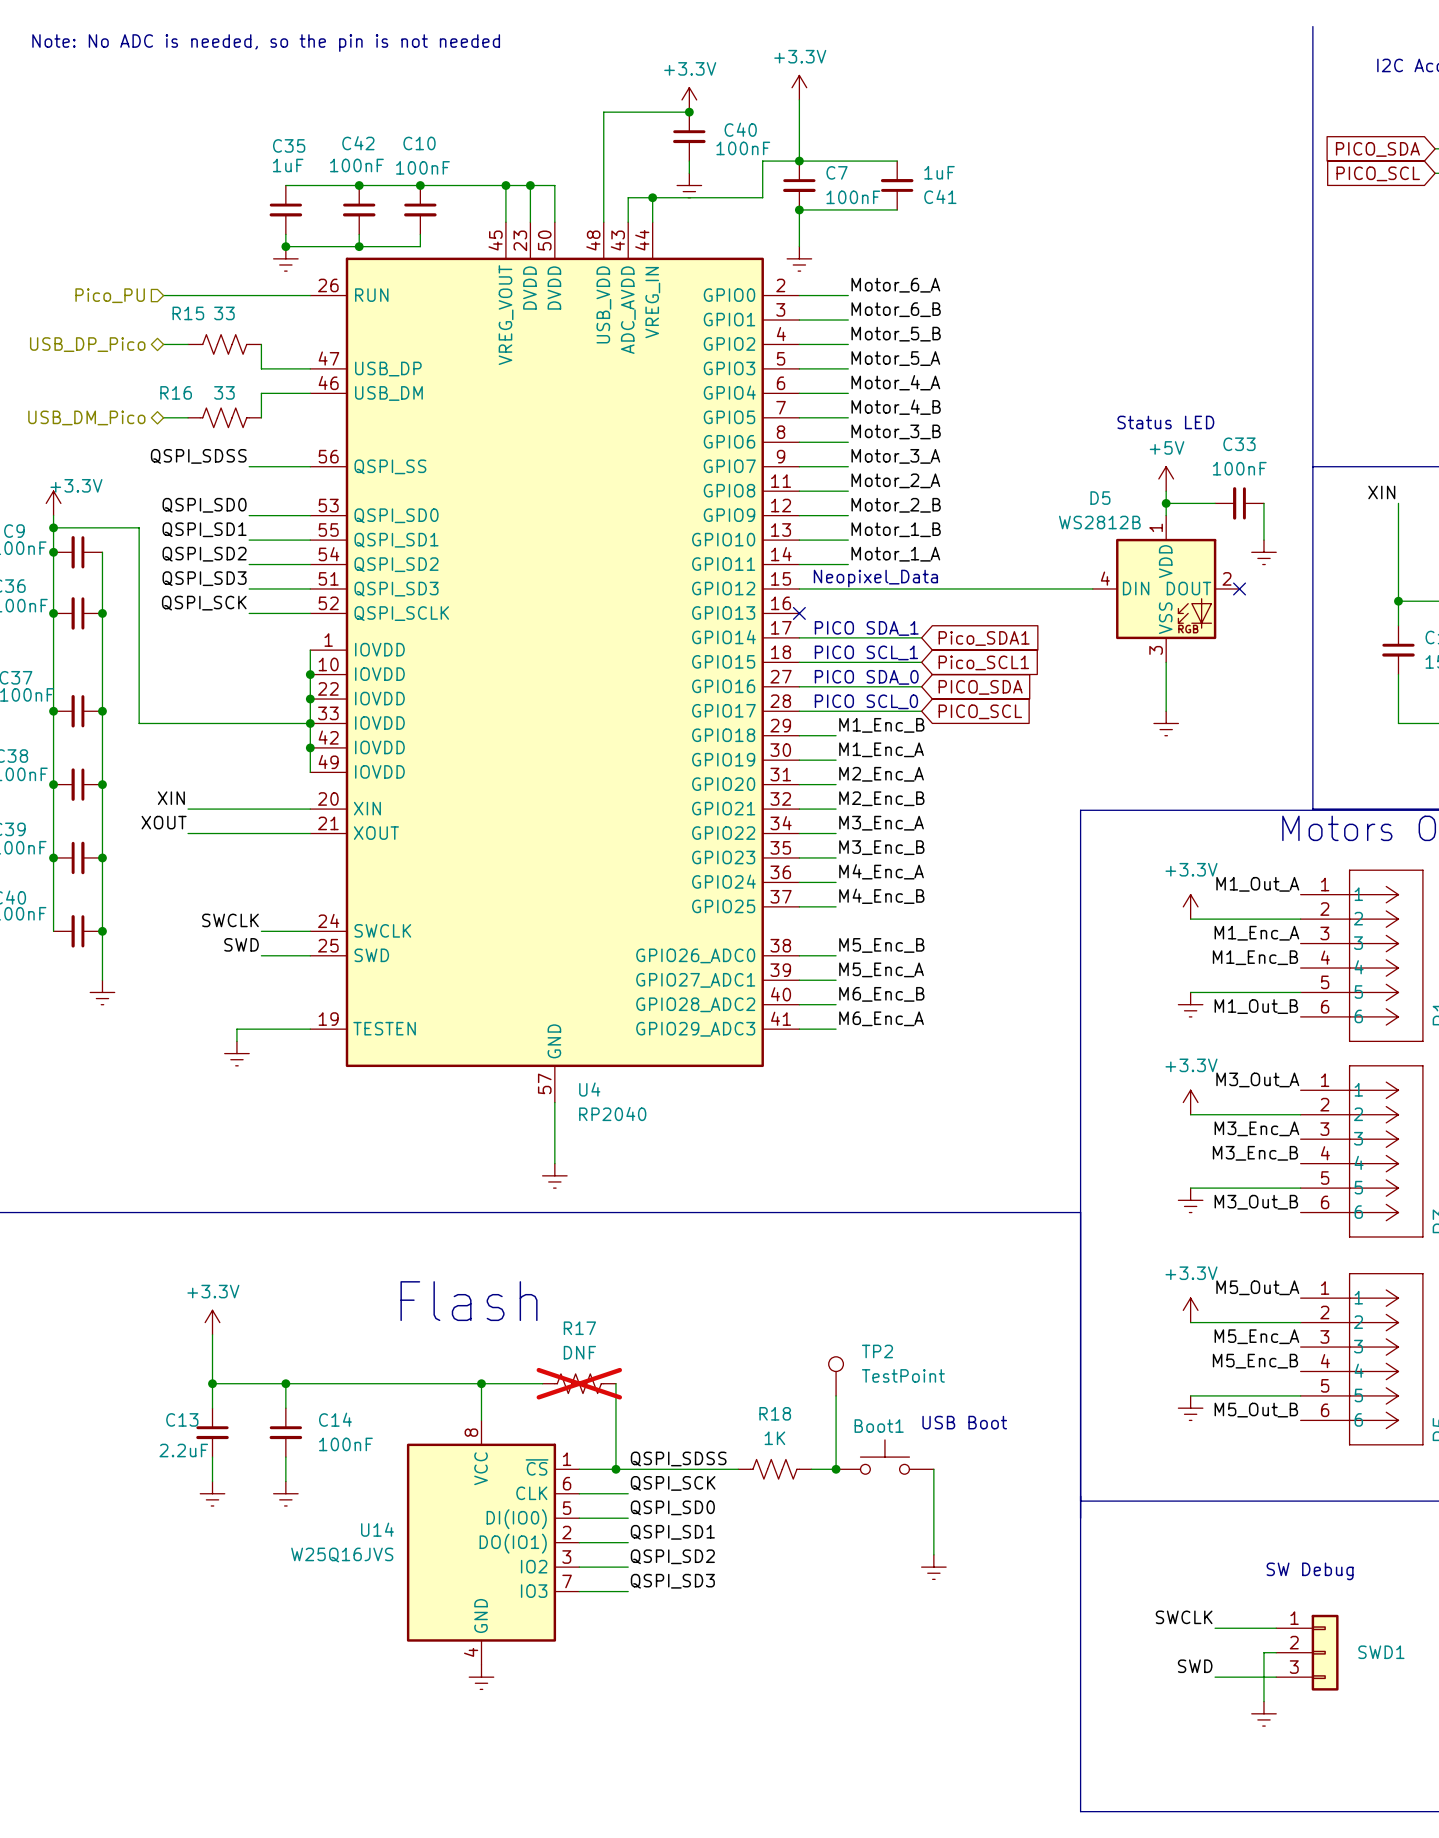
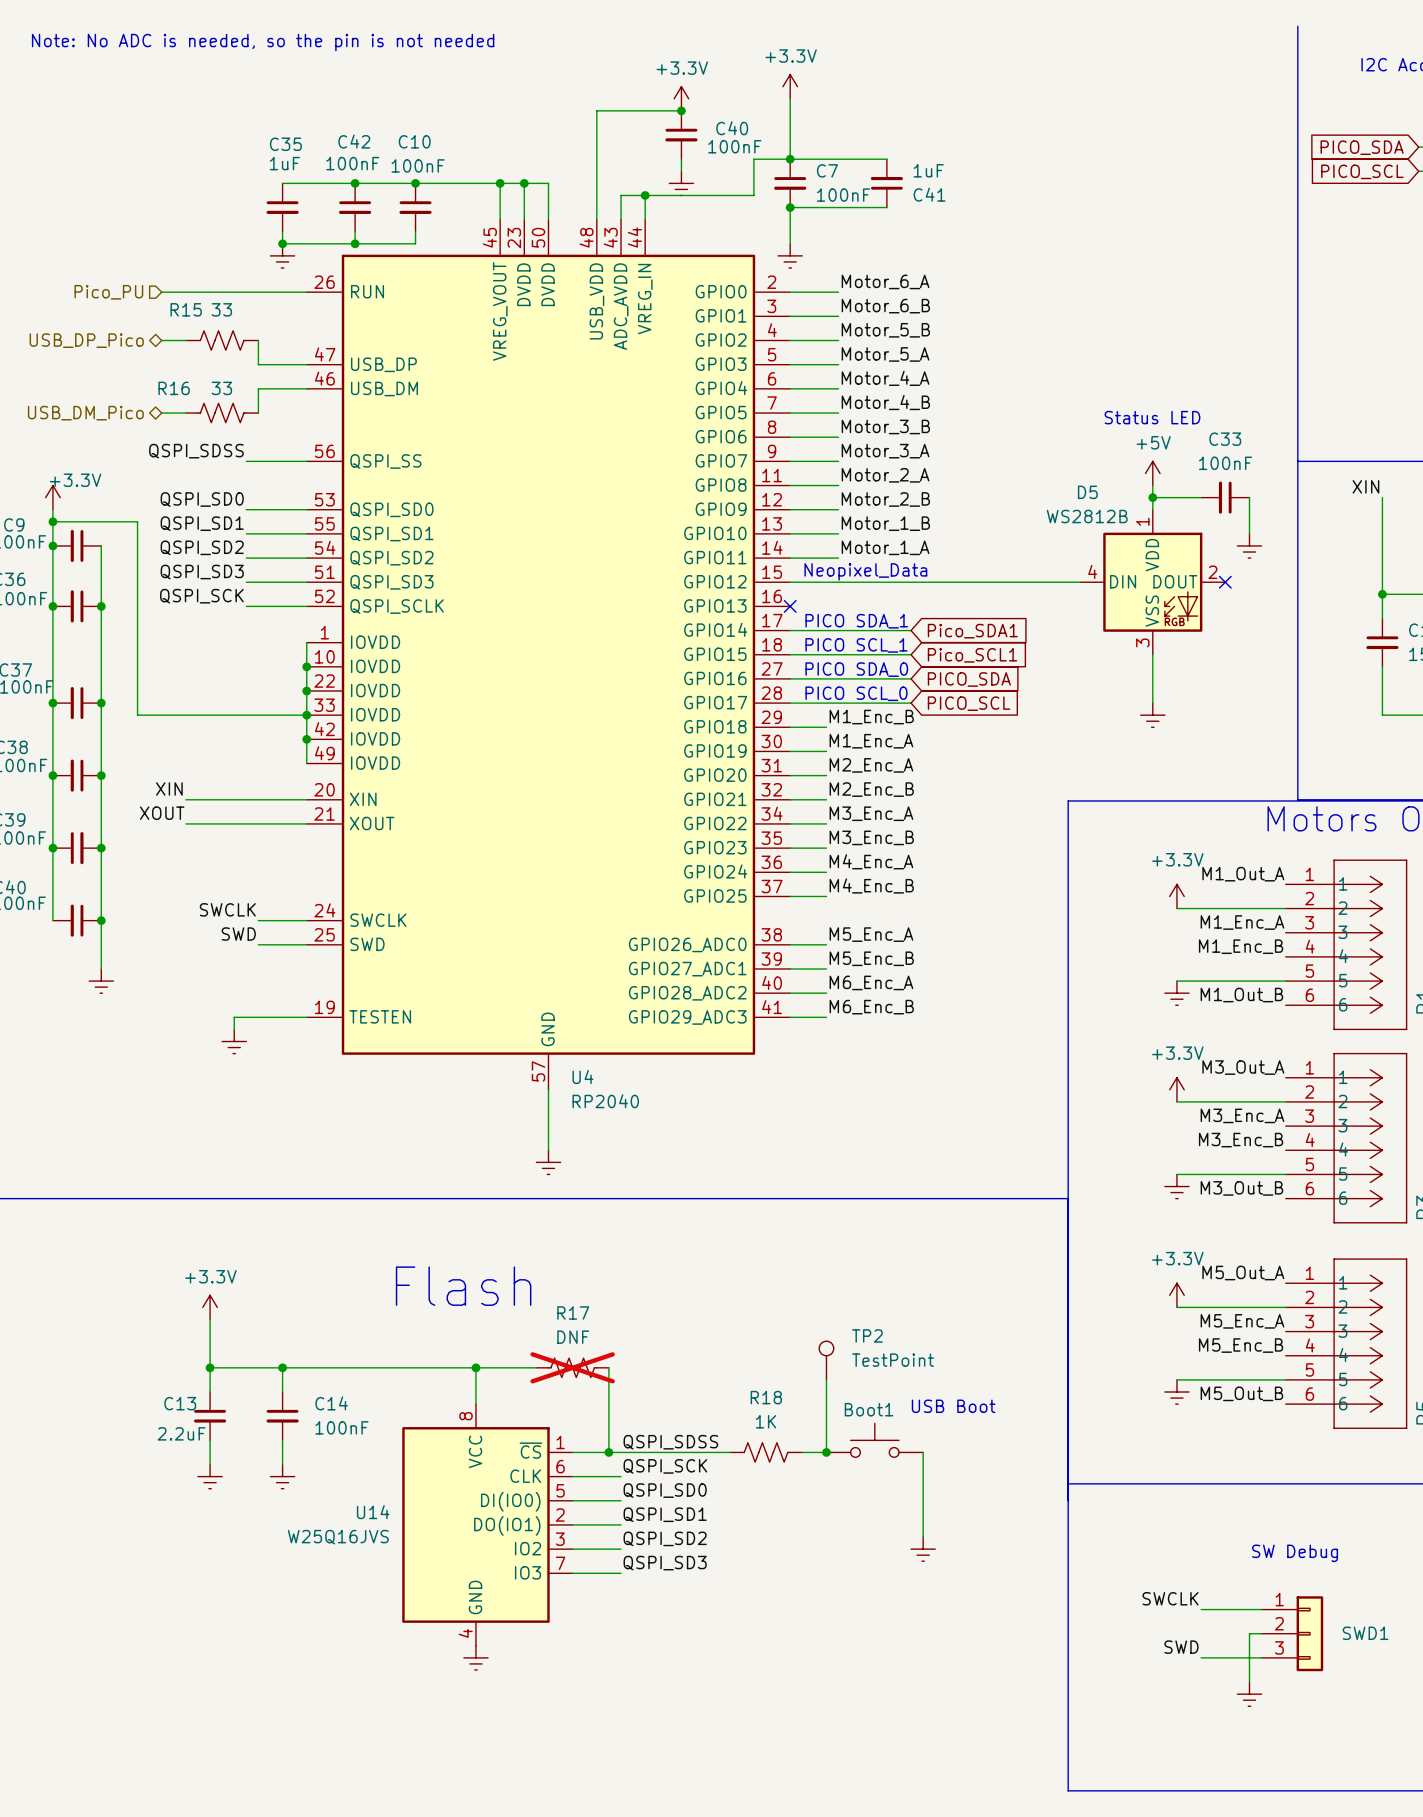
label: M5_Enc_B (881, 945) -> M5_Enc_A (871, 934)
label: M5_Enc_A (881, 969) -> M5_Enc_B (871, 958)
label: M6_Enc_B (881, 994) -> M6_Enc_A (871, 982)
label: M6_Enc_A (881, 1018) -> M6_Enc_B (871, 1007)

